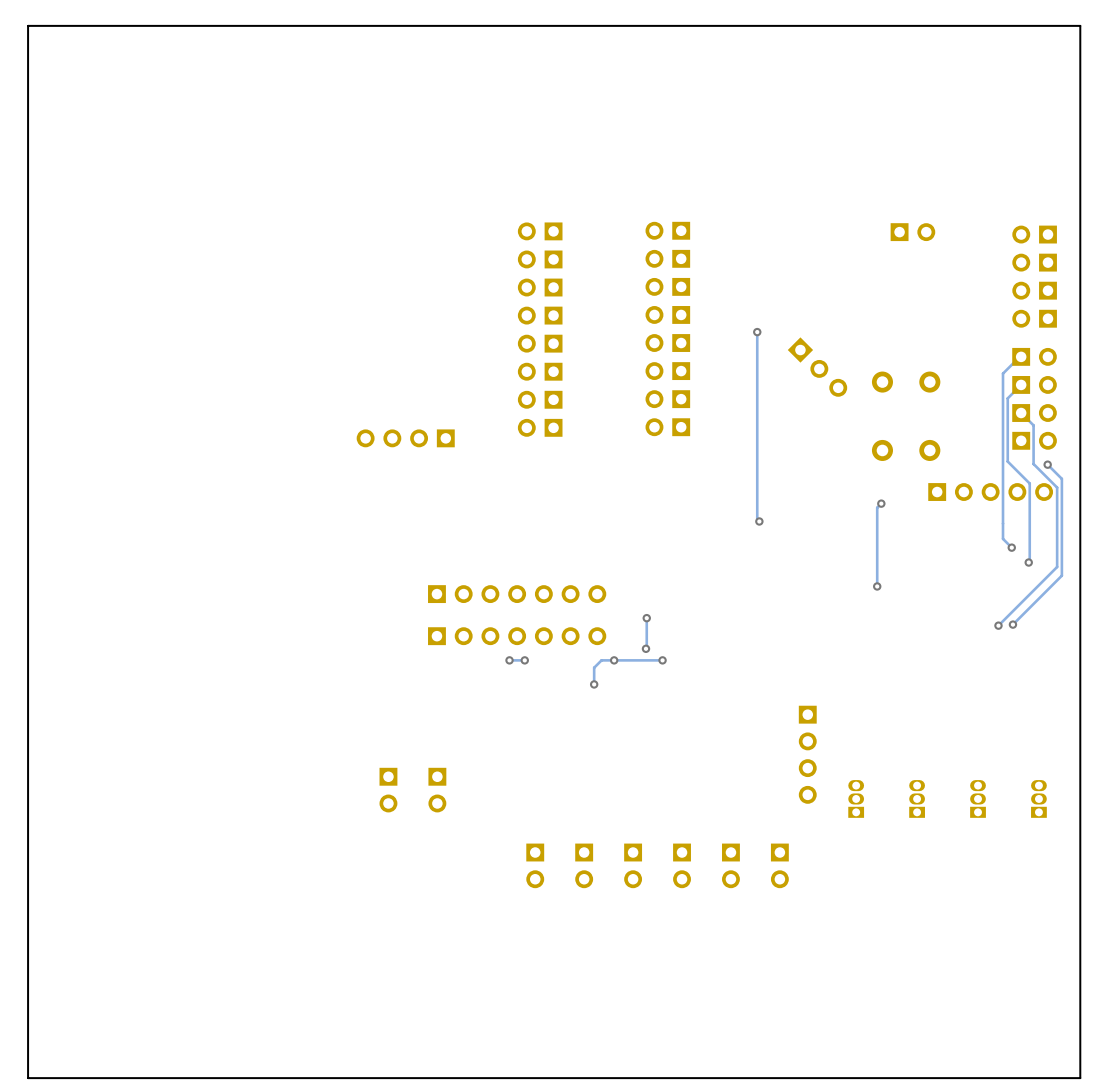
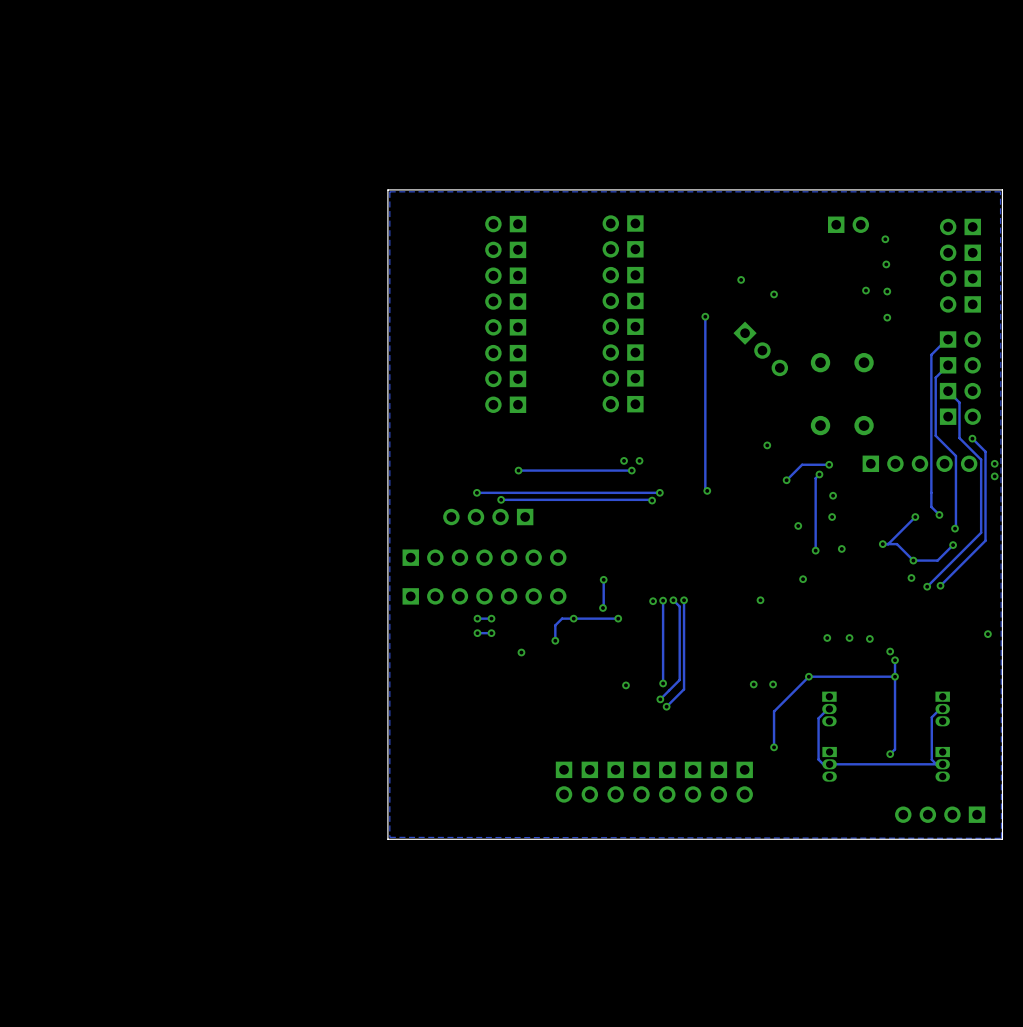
board edge: (1080, 194) (1080, 25) (28, 25) (28, 1078) (1080, 1078) (1080, 900) -> (1002, 189) (387, 189) (387, 839) (1002, 839)
zone outline: none -> (1000, 191) (389, 191) (389, 837) (1001, 838) (1000, 191)
via: none -> (885, 239)
via: none -> (886, 264)
via: none -> (741, 279)
via: none -> (865, 290)
via: none -> (887, 291)
via: none -> (774, 294)
via: none -> (887, 317)
part position: (405, 438) -> (488, 517)
via: none -> (767, 445)
via: none -> (624, 460)
via: none -> (639, 460)
via: none -> (994, 463)
track: none -> (829, 464) (802, 464) (786, 480)
via: none -> (829, 464)
via: none -> (518, 470)
track: none -> (631, 470) (518, 470)
via: none -> (631, 470)
via: none -> (994, 476)
via: none -> (786, 480)
via: none -> (476, 492)
track: none -> (659, 492) (476, 492)
via: none -> (659, 492)
via: none -> (833, 495)
track: none -> (501, 499) (652, 500)
via: none -> (501, 499)
via: none -> (652, 500)
via: none -> (832, 517)
track: none -> (915, 517) (888, 544)
via: none -> (915, 517)
via: none -> (798, 525)
track: none -> (882, 544) (896, 544) (913, 560) (937, 560) (953, 545)
via: none -> (882, 544)
via: none -> (953, 545)
via: none -> (841, 548)
via: none -> (913, 560)
via: none -> (911, 577)
via: none -> (803, 579)
track: none -> (663, 600) (663, 683)
via: none -> (663, 600)
track: none -> (673, 600) (679, 606) (679, 680) (660, 699)
via: none -> (673, 600)
track: none -> (684, 600) (684, 689) (666, 706)
via: none -> (684, 600)
via: none -> (760, 600)
via: none -> (653, 601)
via: none -> (477, 633)
track: none -> (491, 633) (477, 633)
via: none -> (491, 633)
via: none -> (987, 634)
via: none -> (827, 637)
via: none -> (849, 637)
via: none -> (869, 638)
via: none -> (890, 651)
via: none -> (521, 652)
track: none -> (895, 660) (895, 749) (890, 754)
via: none -> (895, 660)
via: none -> (808, 676)
track: none -> (895, 676) (808, 676) (774, 711) (774, 747)
via: none -> (895, 676)
via: none -> (663, 683)
via: none -> (753, 684)
via: none -> (773, 684)
via: none -> (625, 685)
via: none -> (660, 699)
part: (807, 754) -> none
via: none -> (666, 706)
track: none -> (829, 708) (818, 718) (818, 759) (823, 764) (942, 764)
part: none -> (829, 708)
track: none -> (942, 708) (940, 708) (931, 717) (931, 759) (936, 764)
part: none -> (942, 708)
part: (388, 790) -> none
part: (437, 790) -> none
part: (856, 798) -> none
part: (917, 798) -> none
part: (978, 798) -> none
part: (1038, 798) -> none
via: none -> (774, 747)
via: none -> (890, 754)
part: none -> (829, 764)
part: none -> (942, 764)
part: none -> (564, 782)
part: none -> (589, 782)
part: none -> (615, 782)
part: none -> (641, 782)
part: none -> (667, 782)
part: none -> (693, 782)
part: none -> (718, 782)
part: none -> (744, 782)
part: (535, 865) -> none
part: (584, 865) -> none
part: (633, 865) -> none
part: (682, 865) -> none
part: (730, 865) -> none
part: (779, 865) -> none
part: none -> (940, 814)

